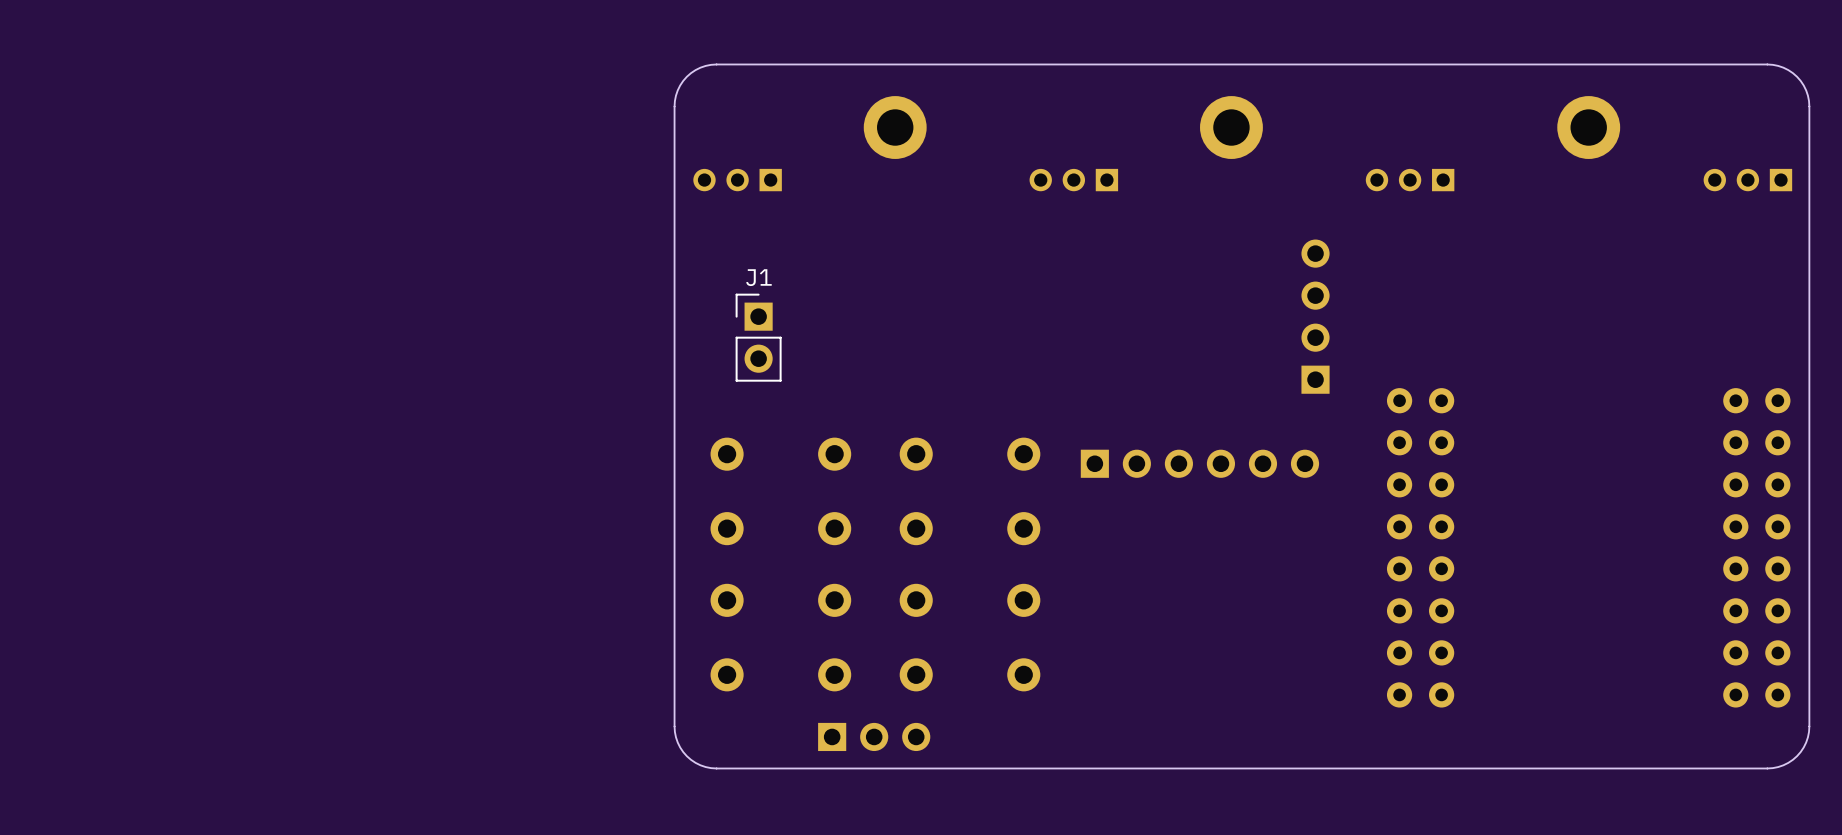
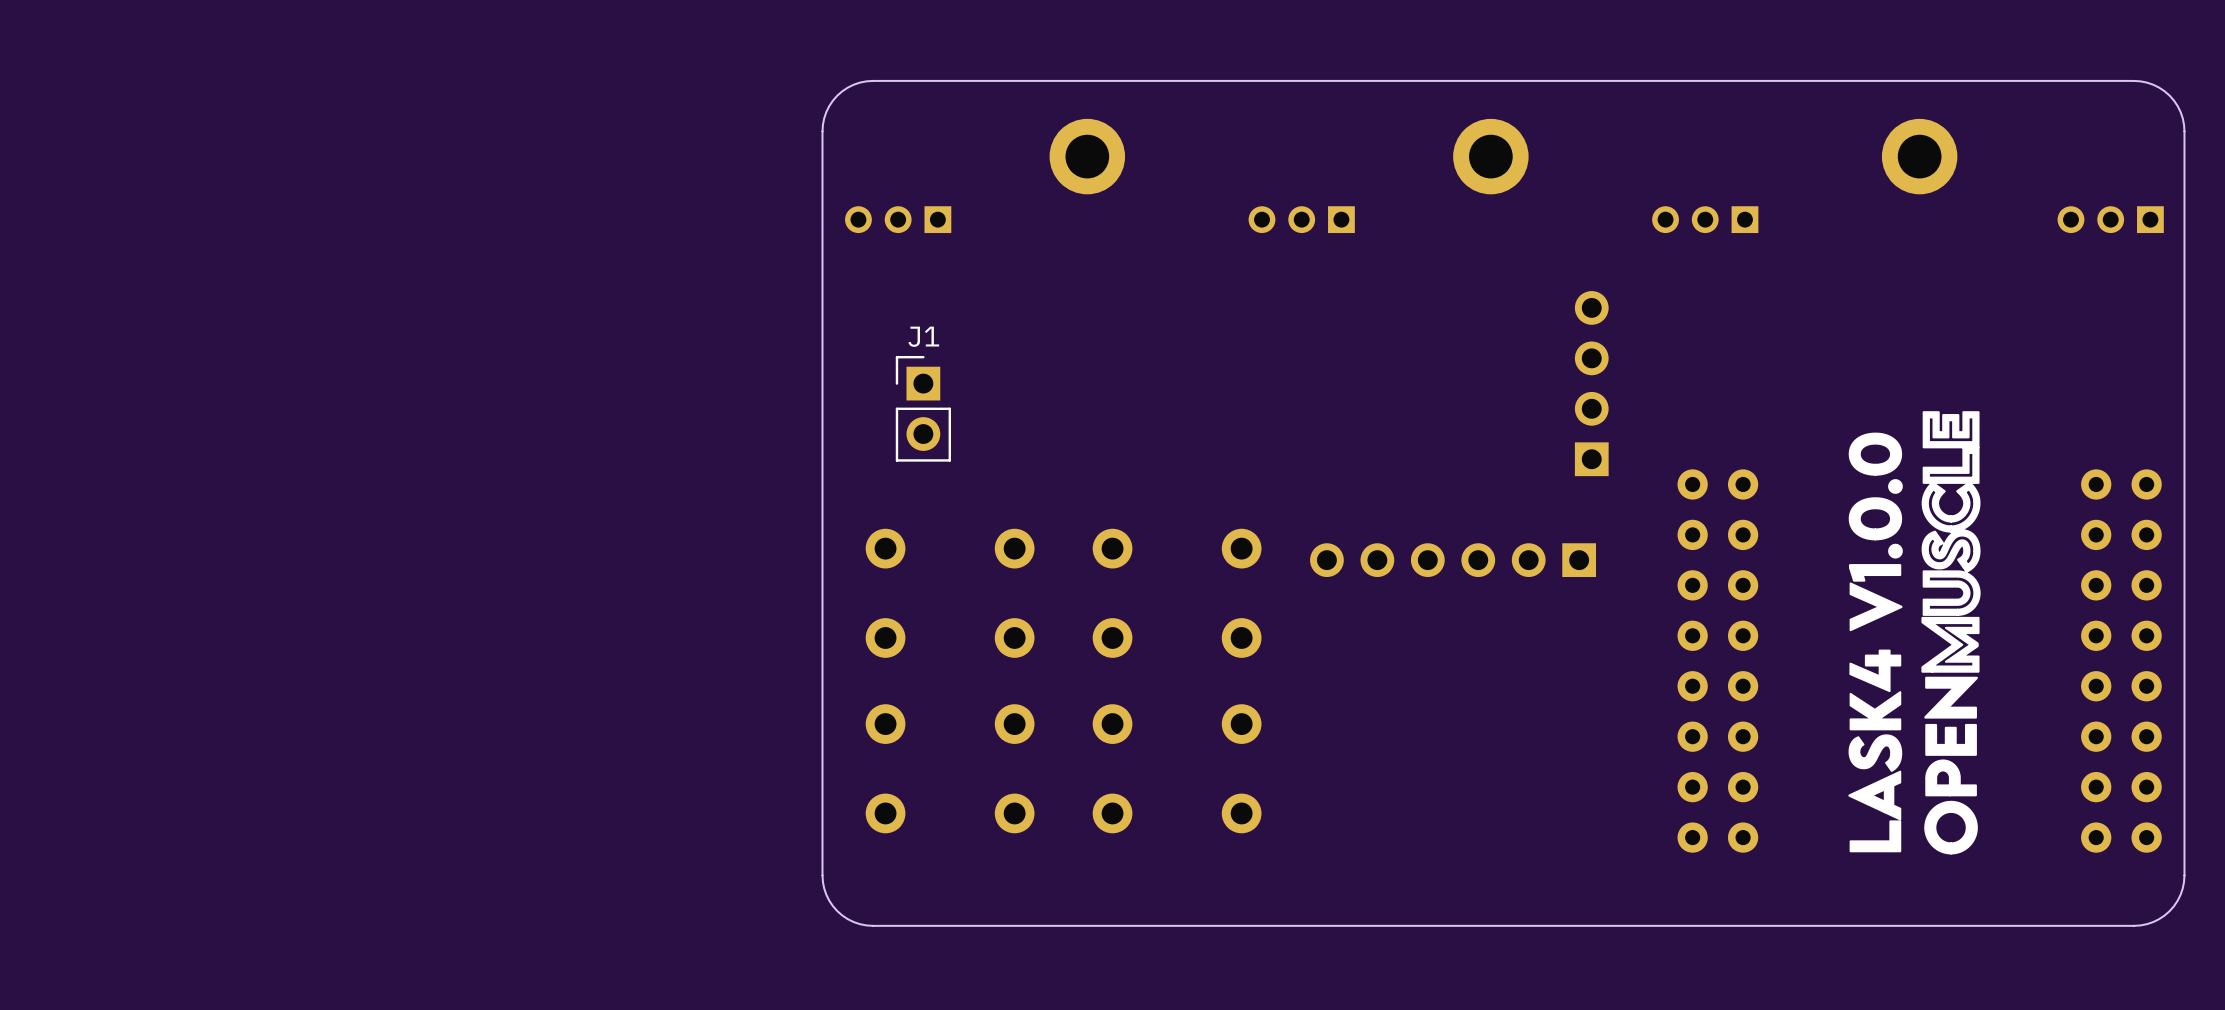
drawing: none -> [1848, 411, 1981, 855]
part rotation: 0° (1199, 463) -> 180° (1453, 560)
part: (874, 736) -> none

